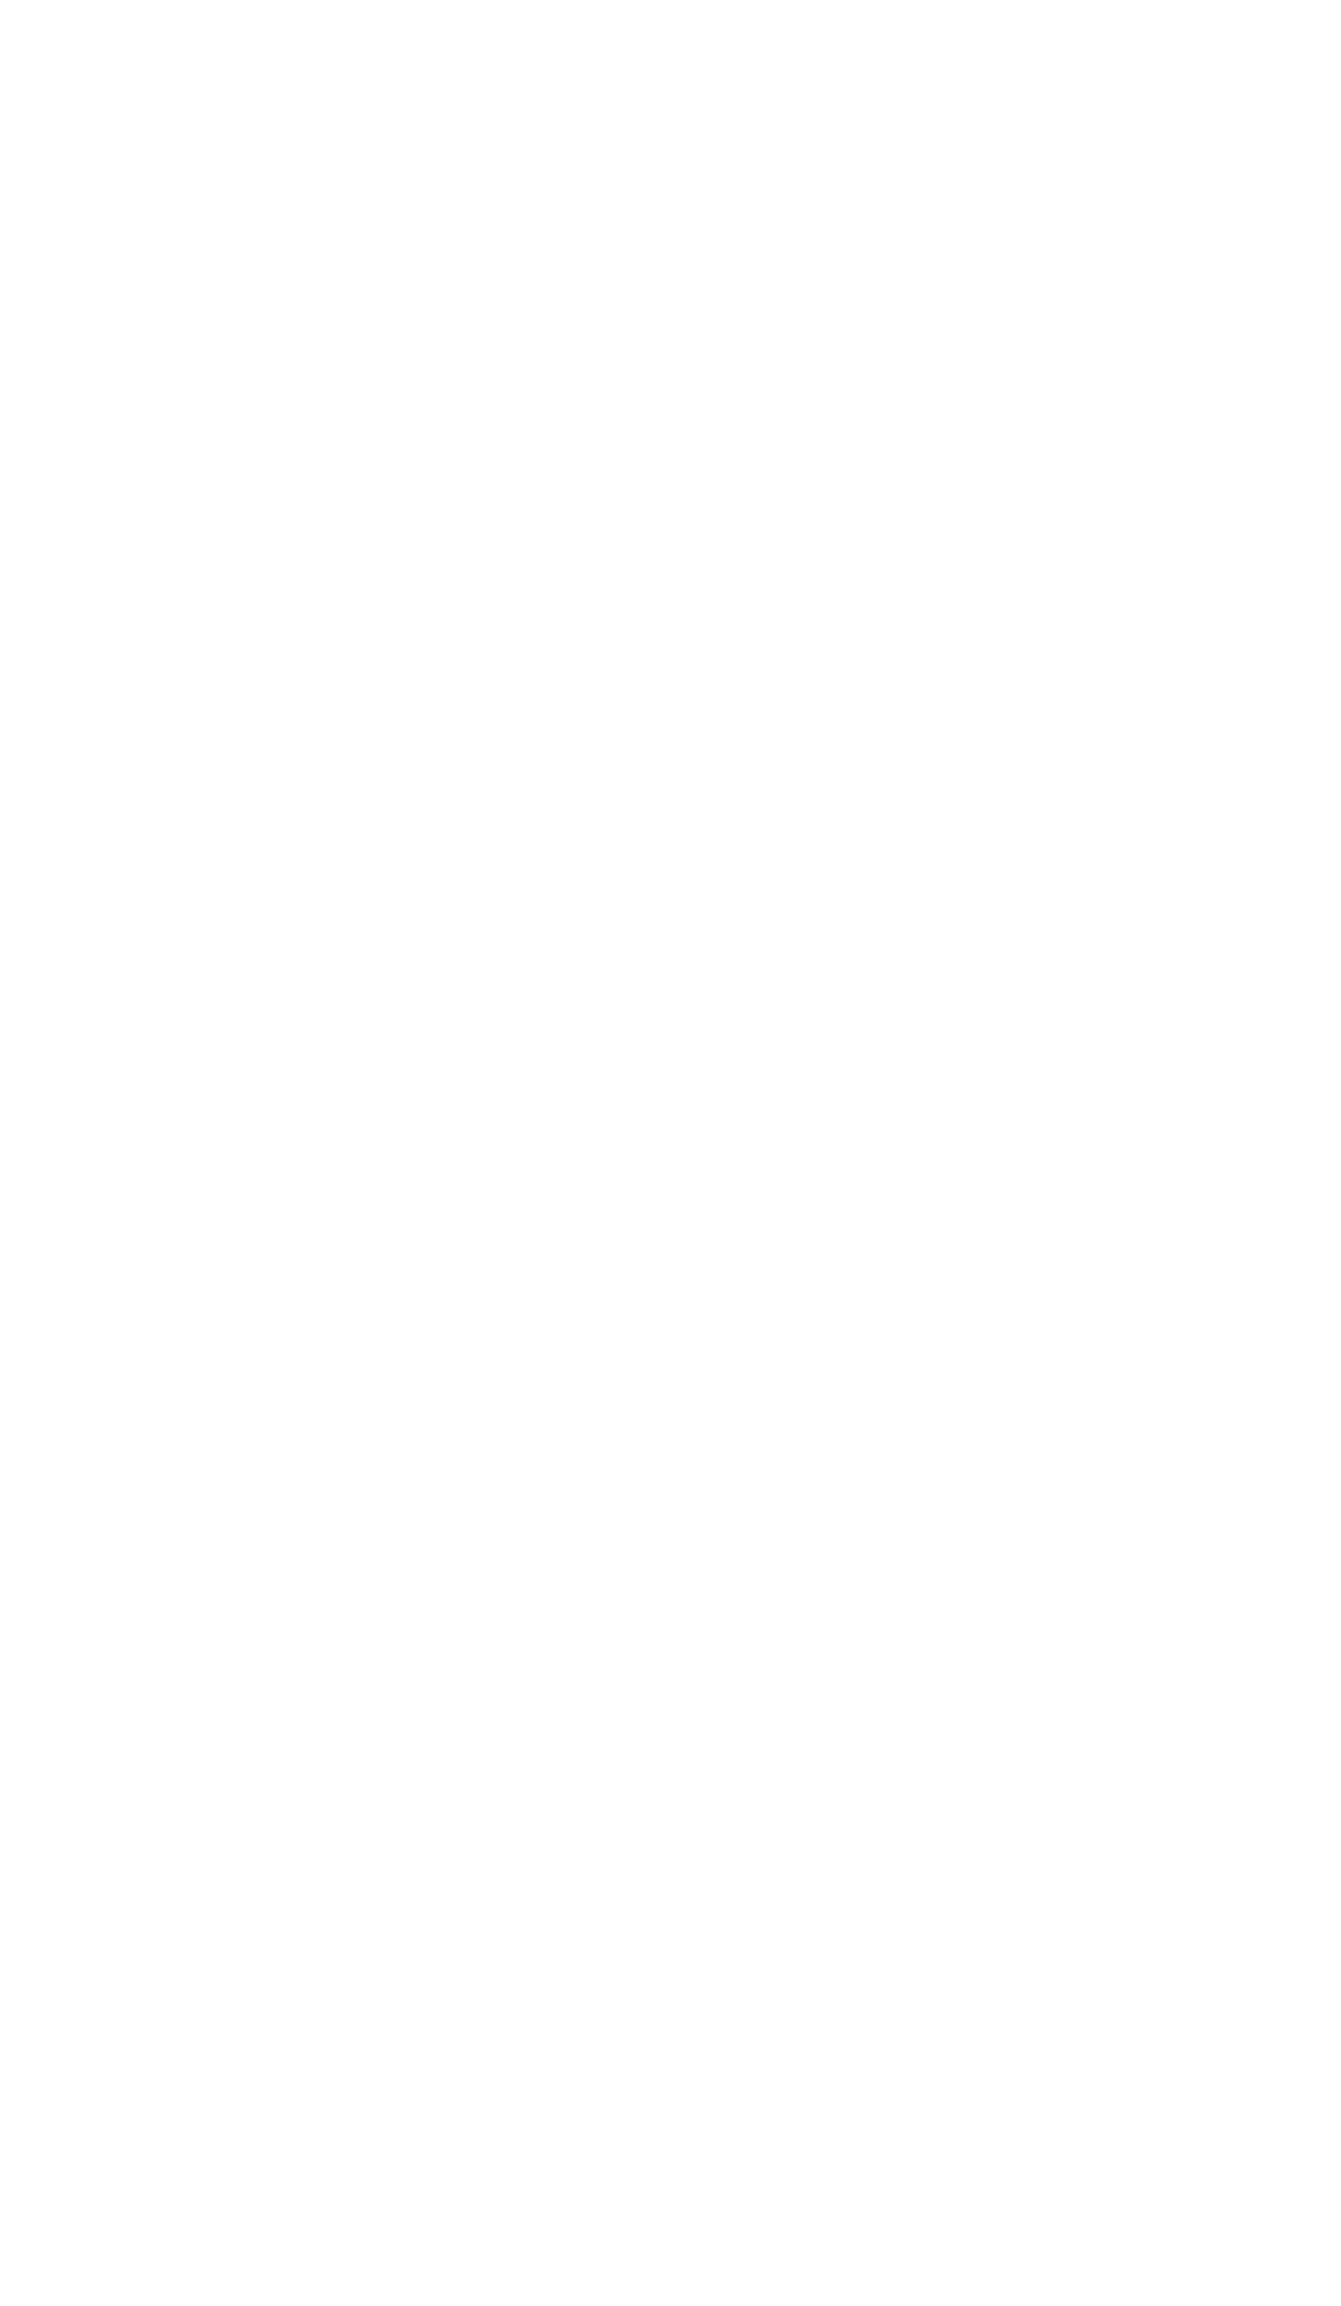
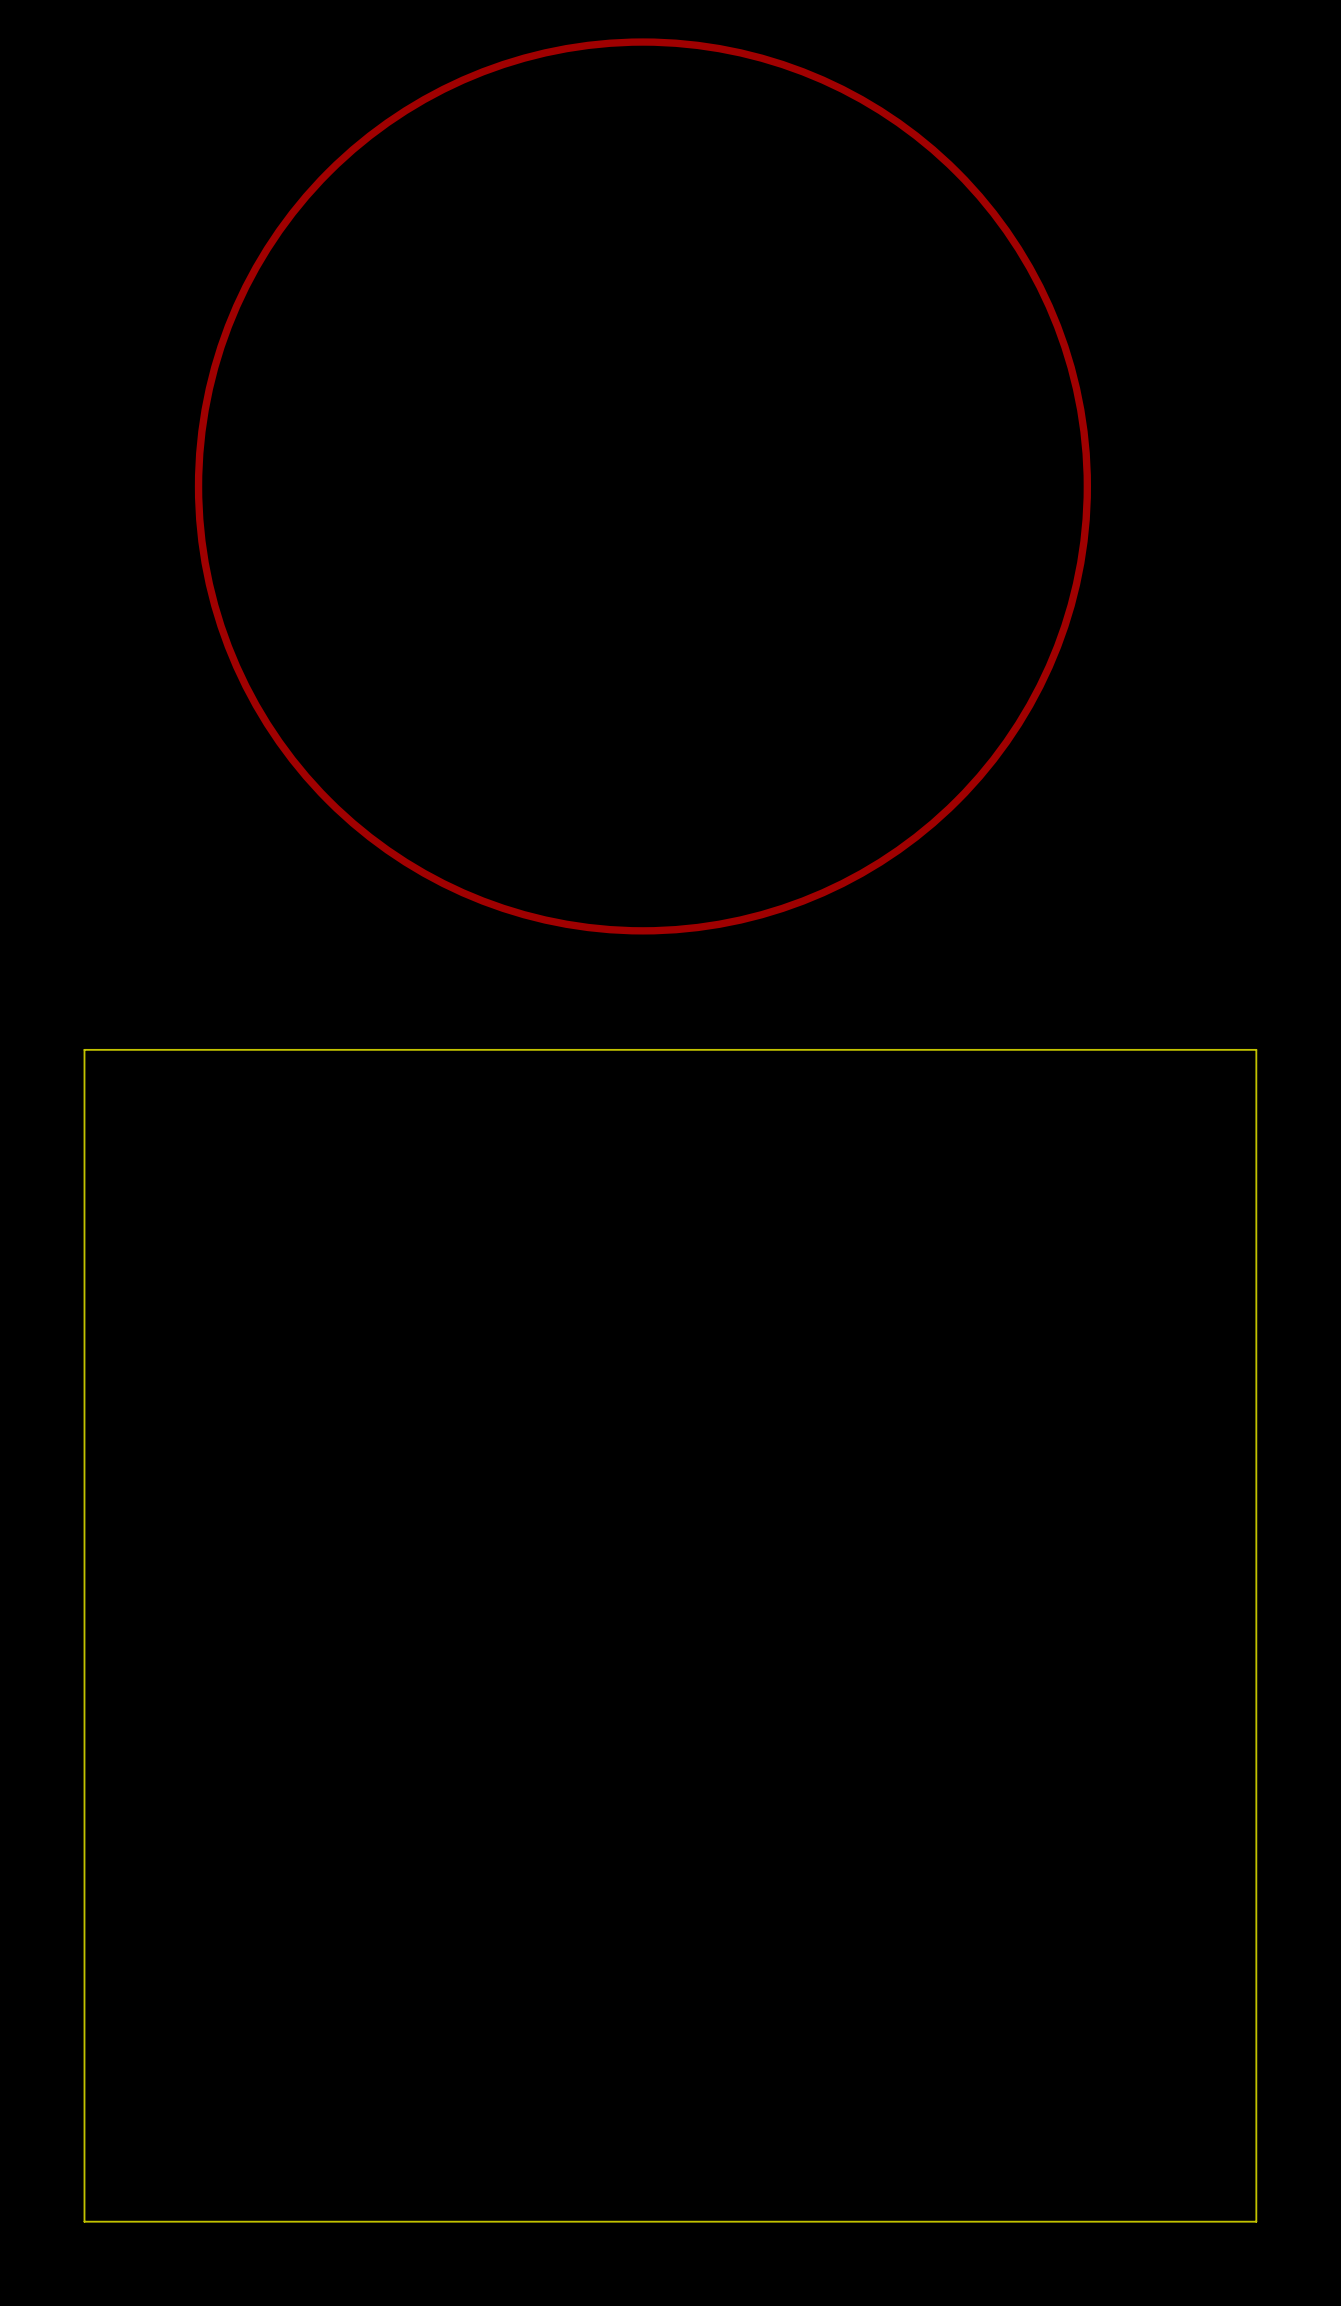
drawing: none -> [194, 38, 1092, 935]
board edge: none -> (84, 1049) (1256, 1049) (1256, 2221) (84, 2221) (84, 1049)

